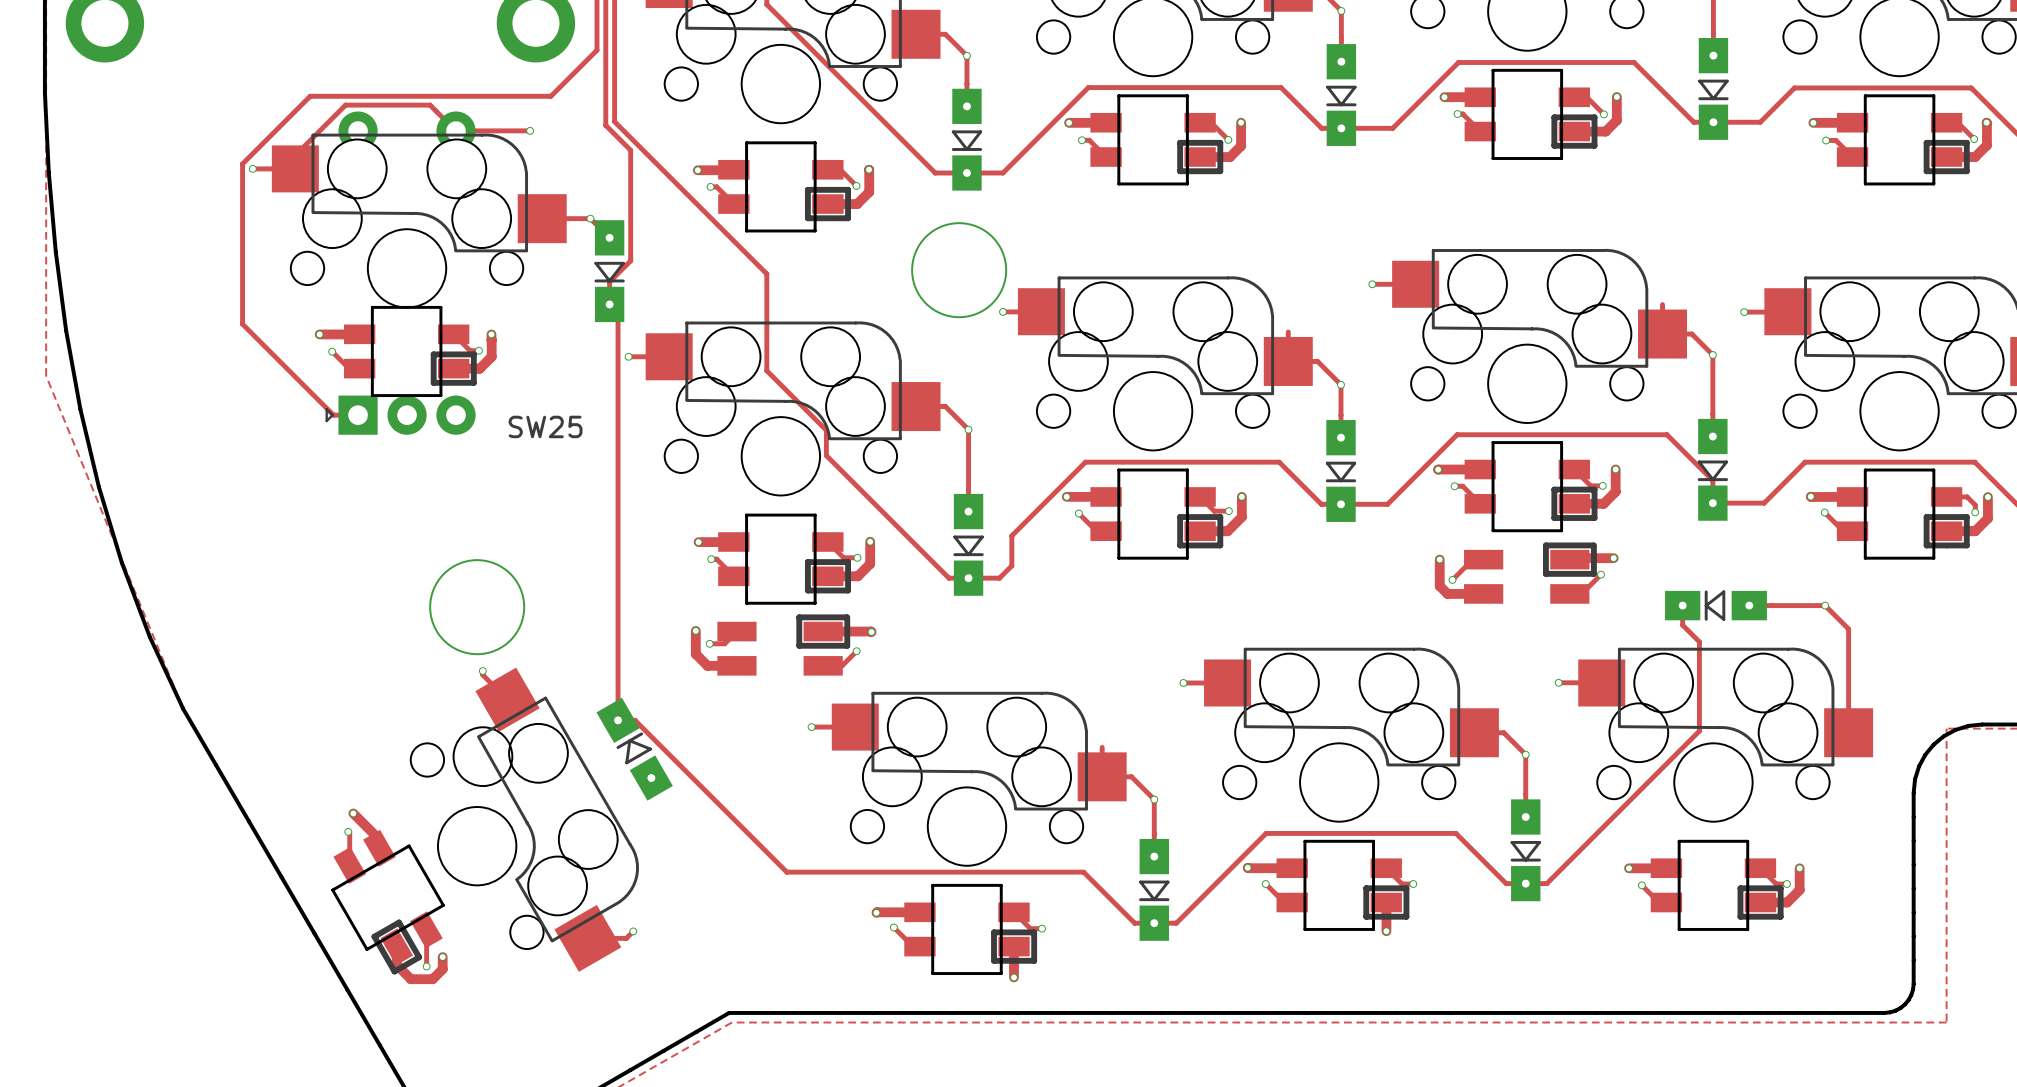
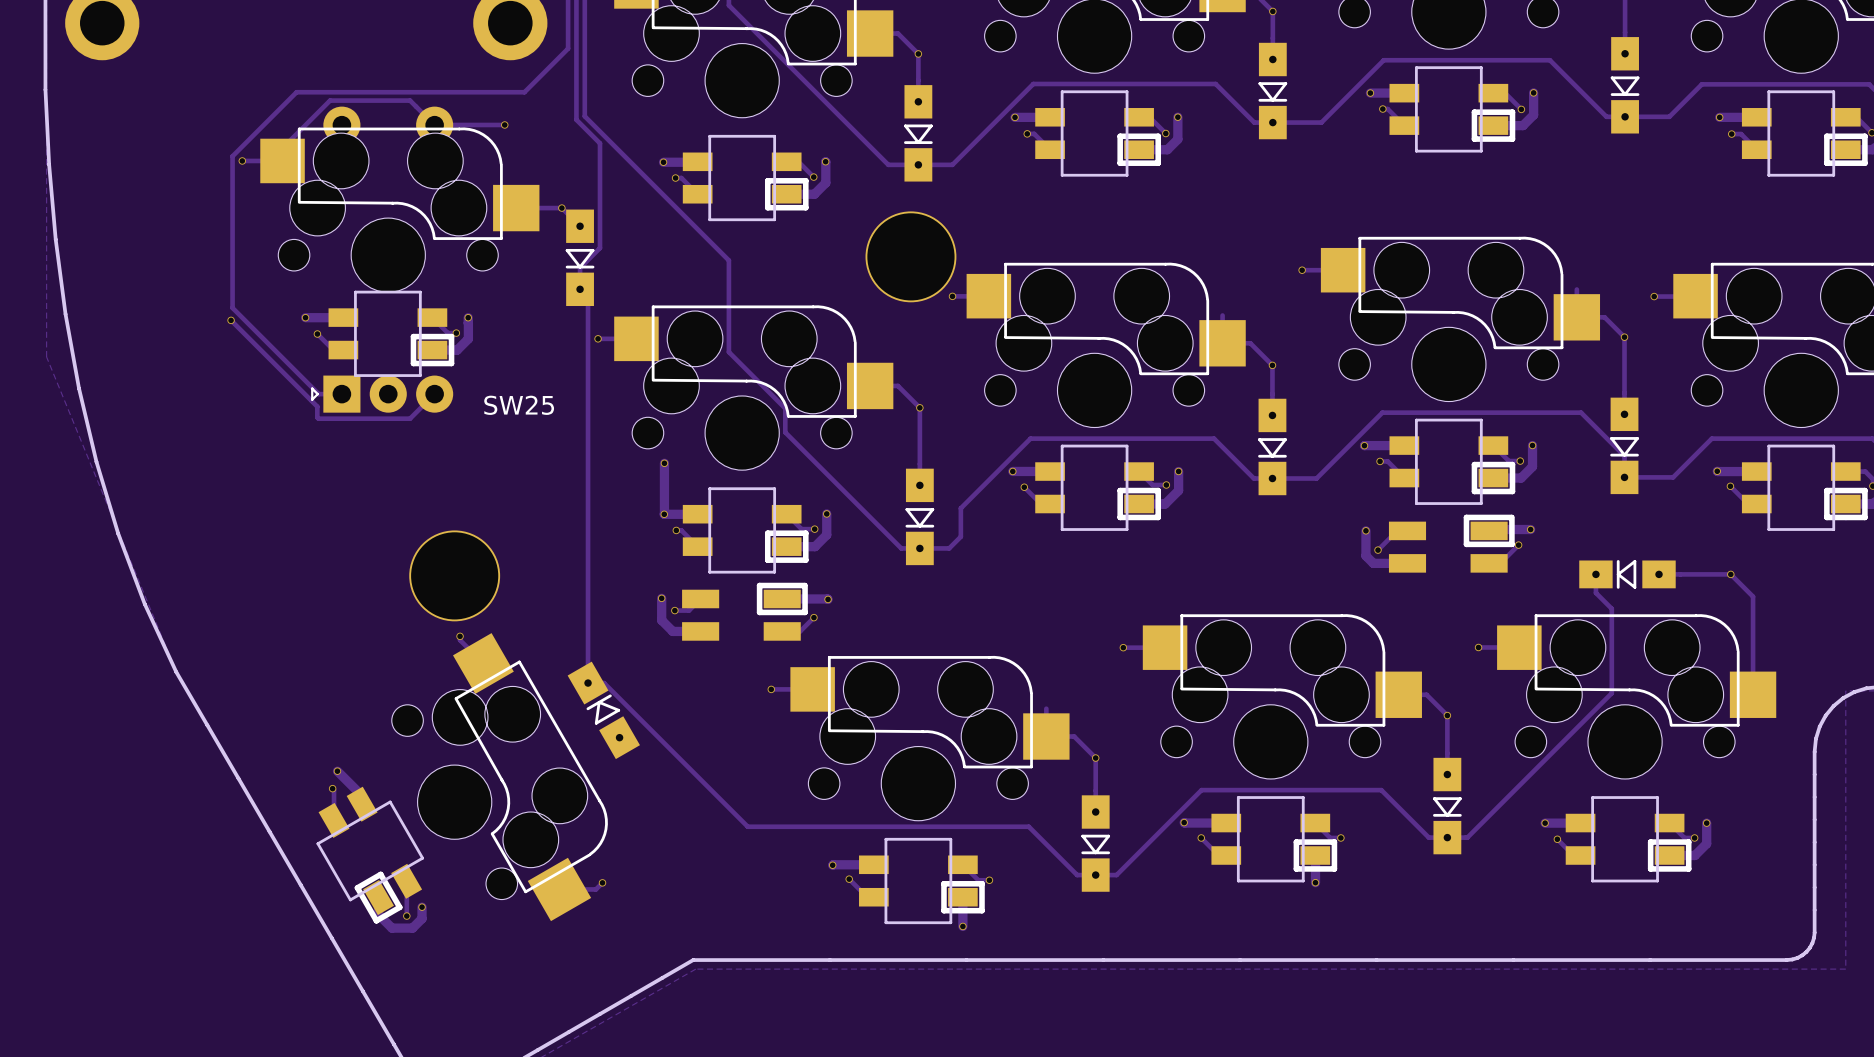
track: none -> (231, 320) (317, 406) (318, 418) (410, 418) (434, 394)
via: none -> (231, 320)
track: none -> (664, 463) (664, 514)
via: none -> (664, 463)

